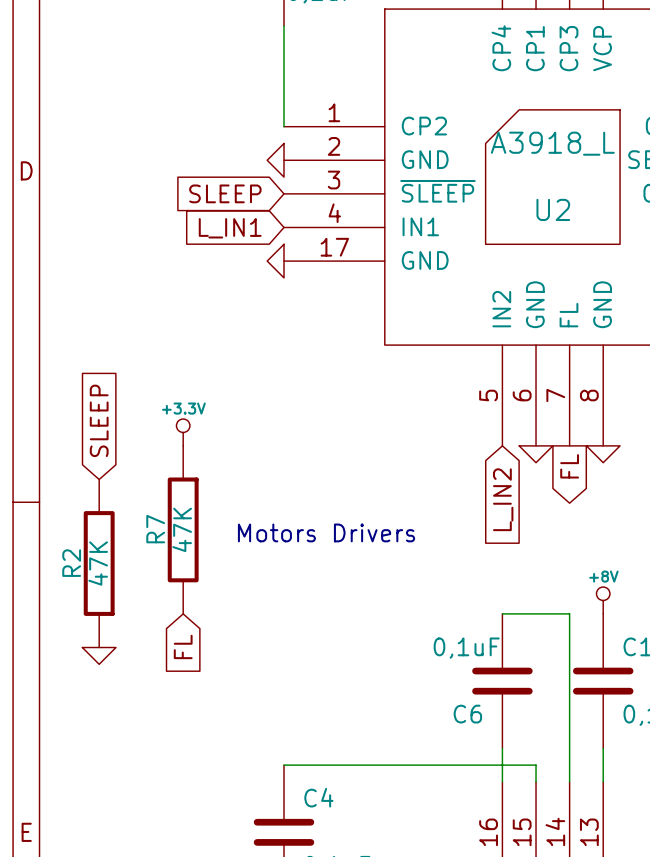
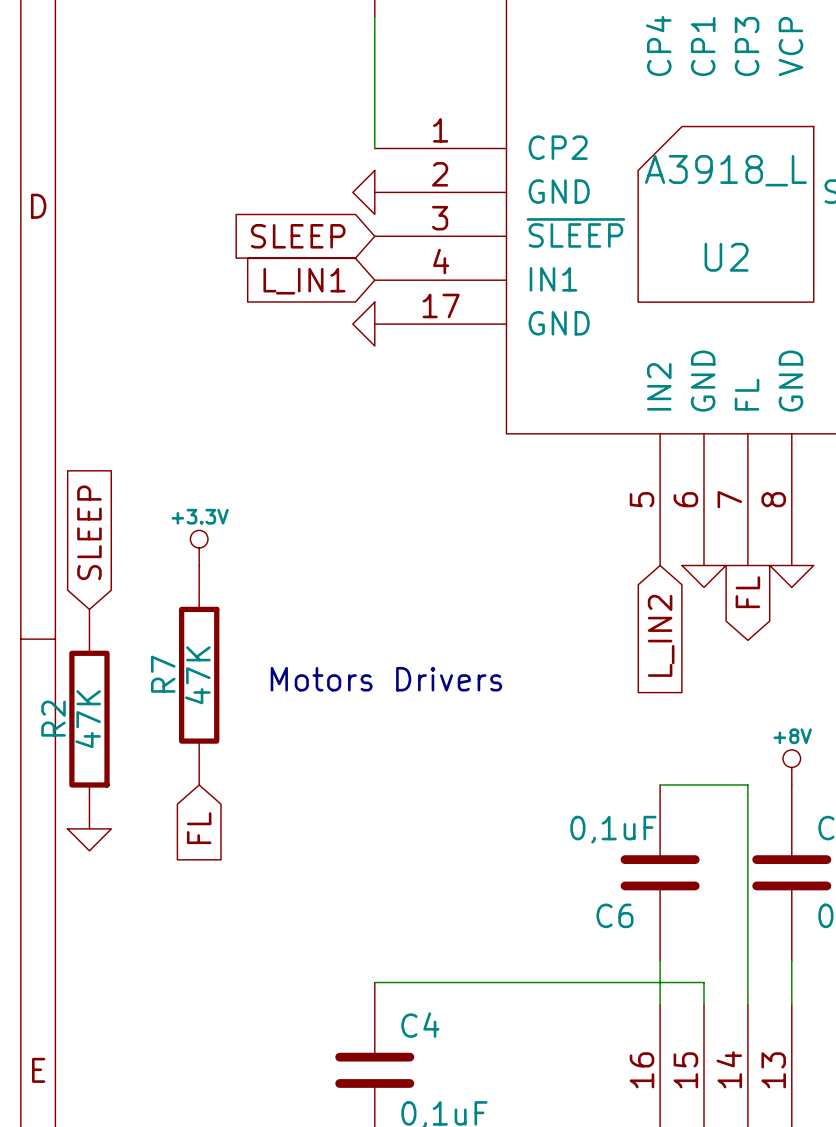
global label position: SLEEP (99, 420) -> SLEEP (89, 532)
power symbol position: +3.3V (183, 432) -> +3.3V (199, 547)
R7 position: (183, 529) -> (199, 675)
text position: Motors Drivers (326, 532) -> Motors Drivers (386, 679)
R2 position: (99, 563) -> (89, 719)
global label position: FL (183, 646) -> FL (199, 828)
power symbol position: (99, 655) -> (89, 839)

